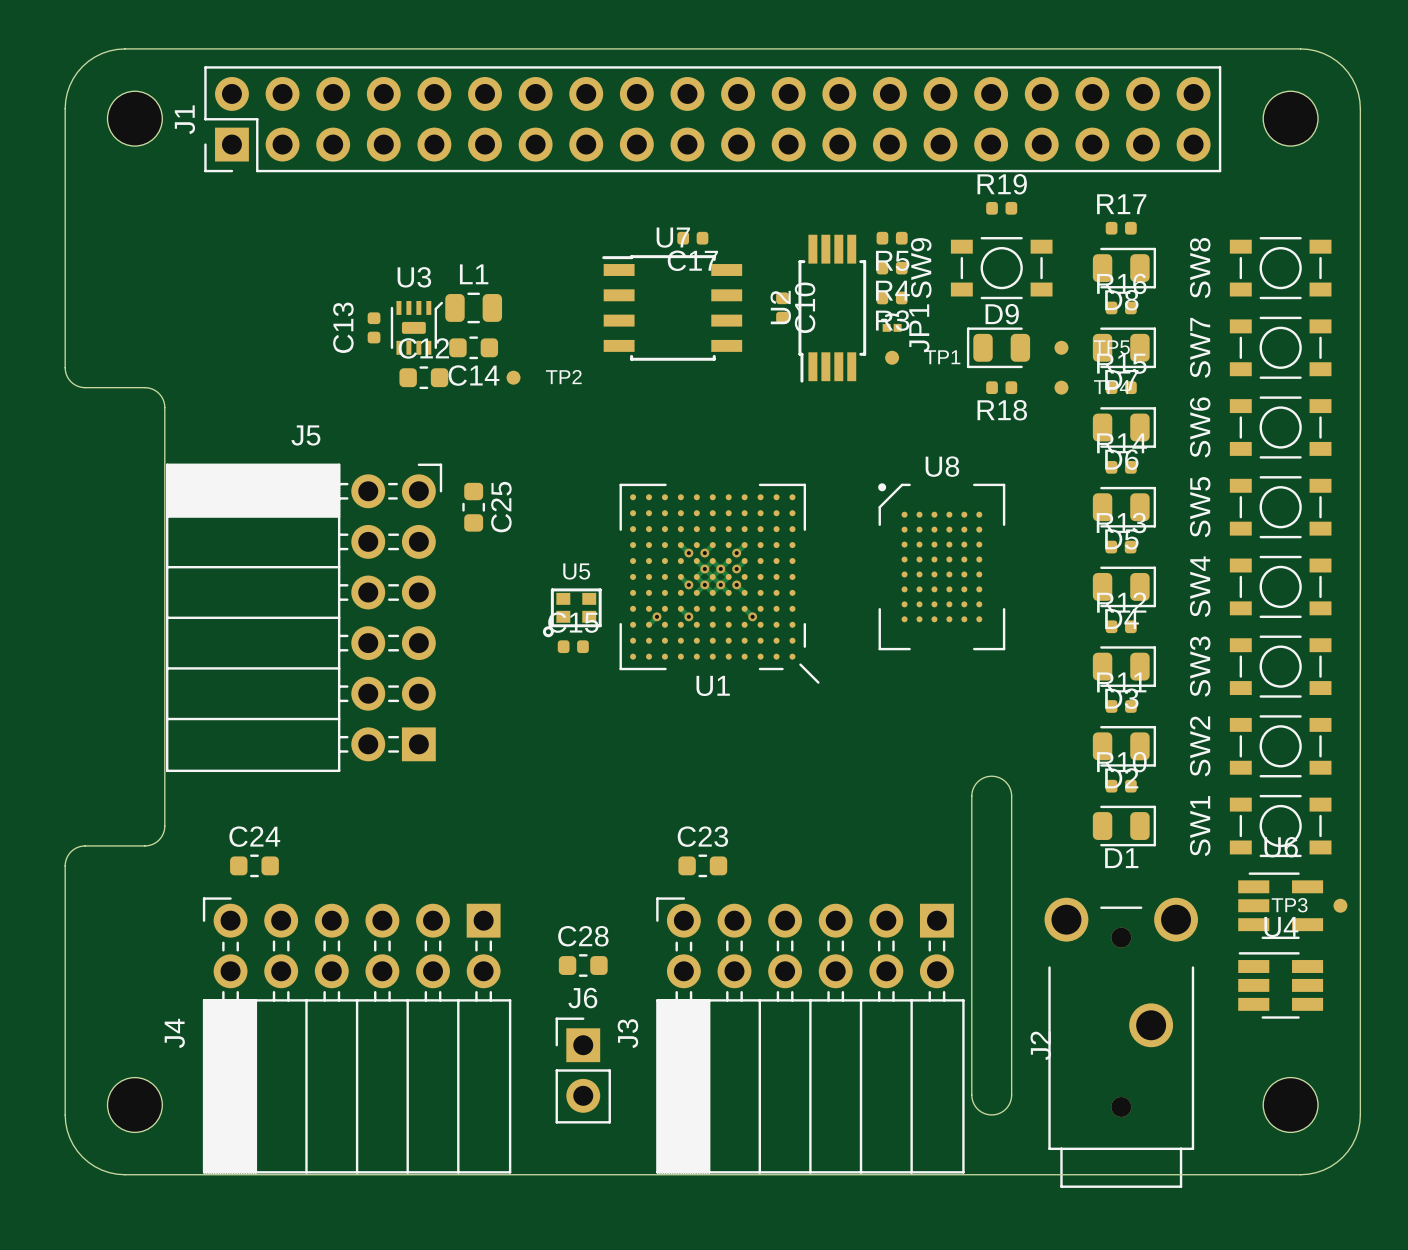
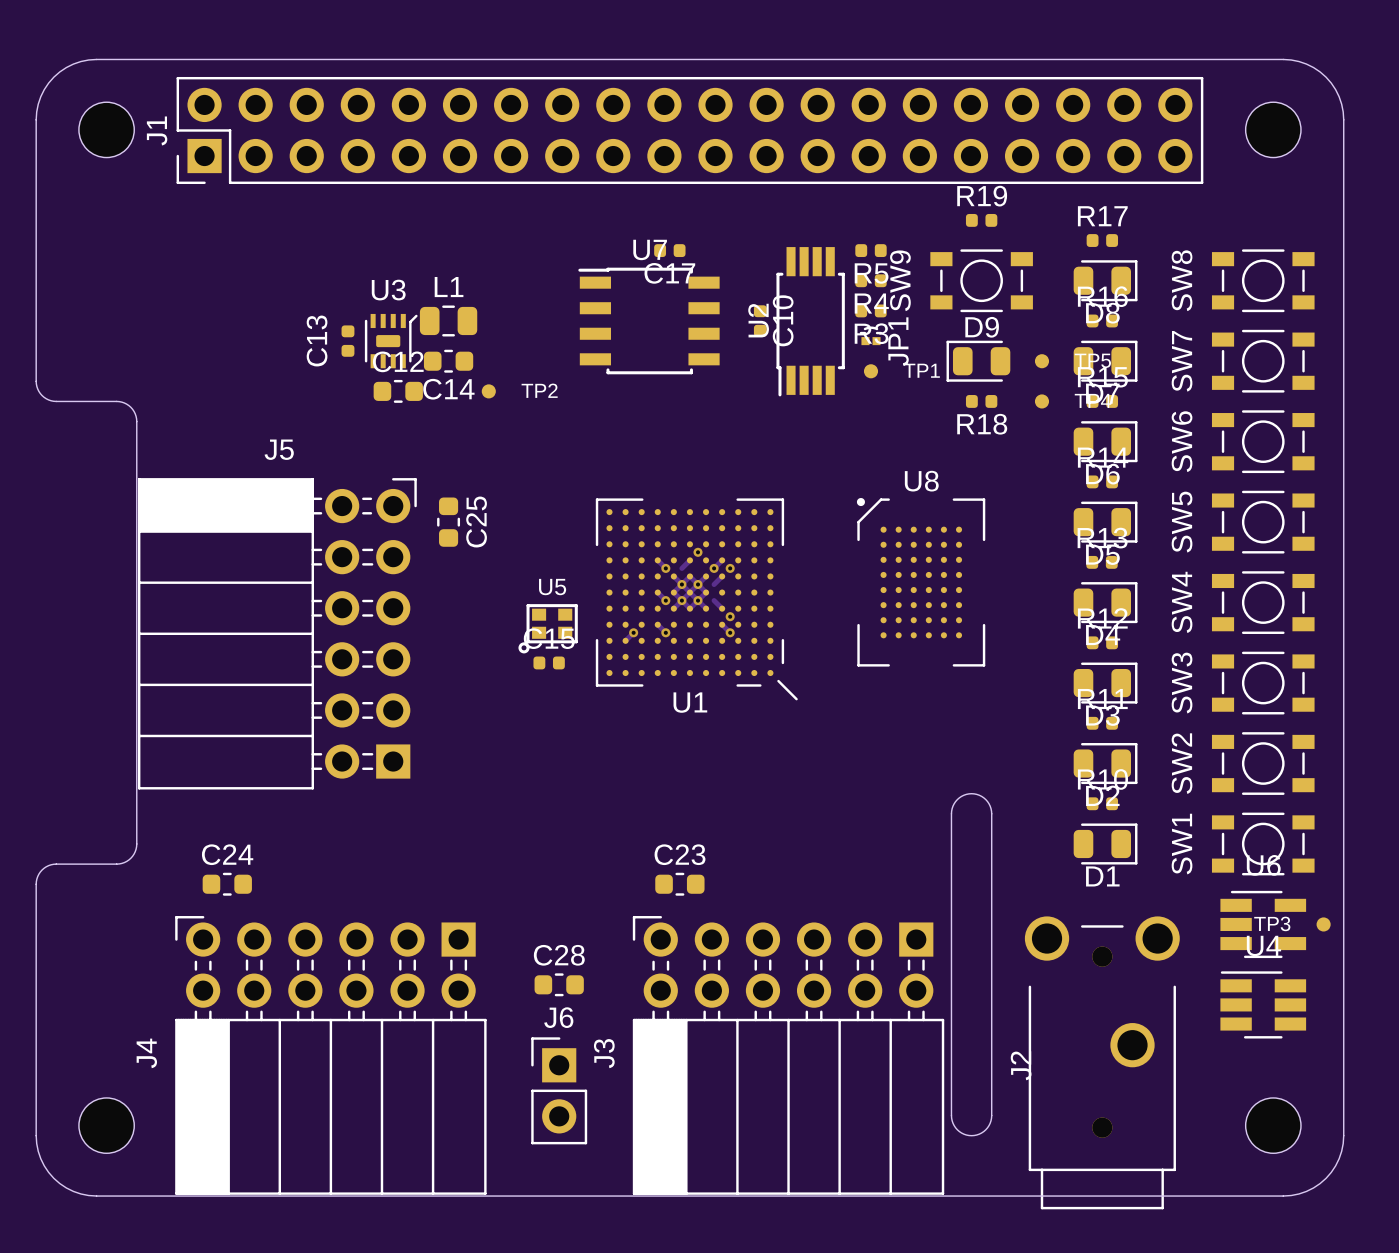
via: none -> (698, 552)
via: (704, 553) -> none
via: none -> (730, 568)
via: (736, 568) -> none
via: (736, 584) -> none
via: none -> (730, 616)

